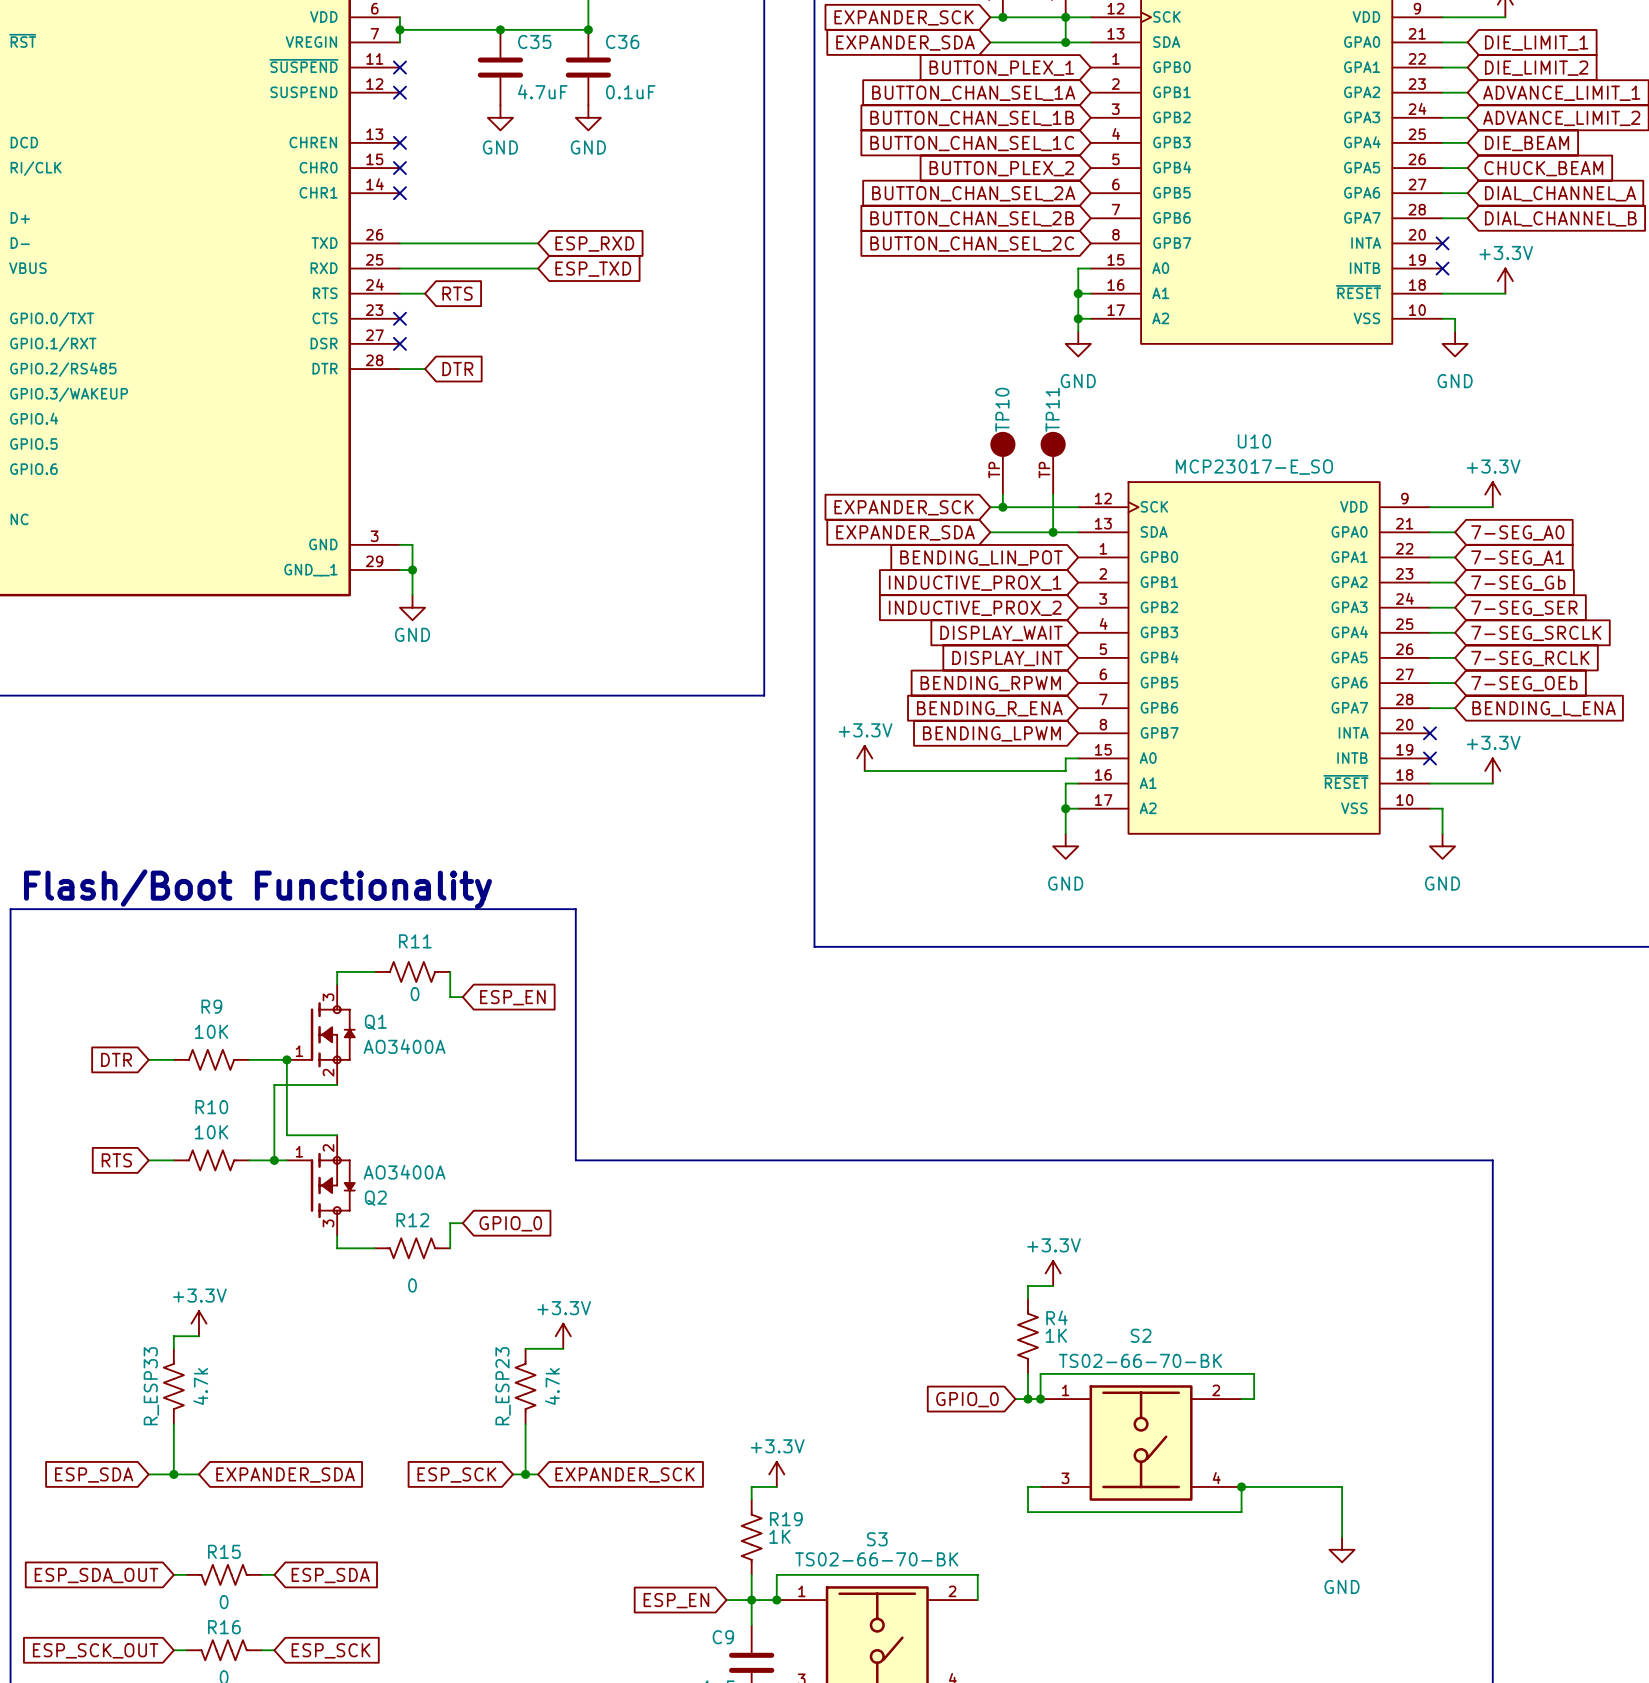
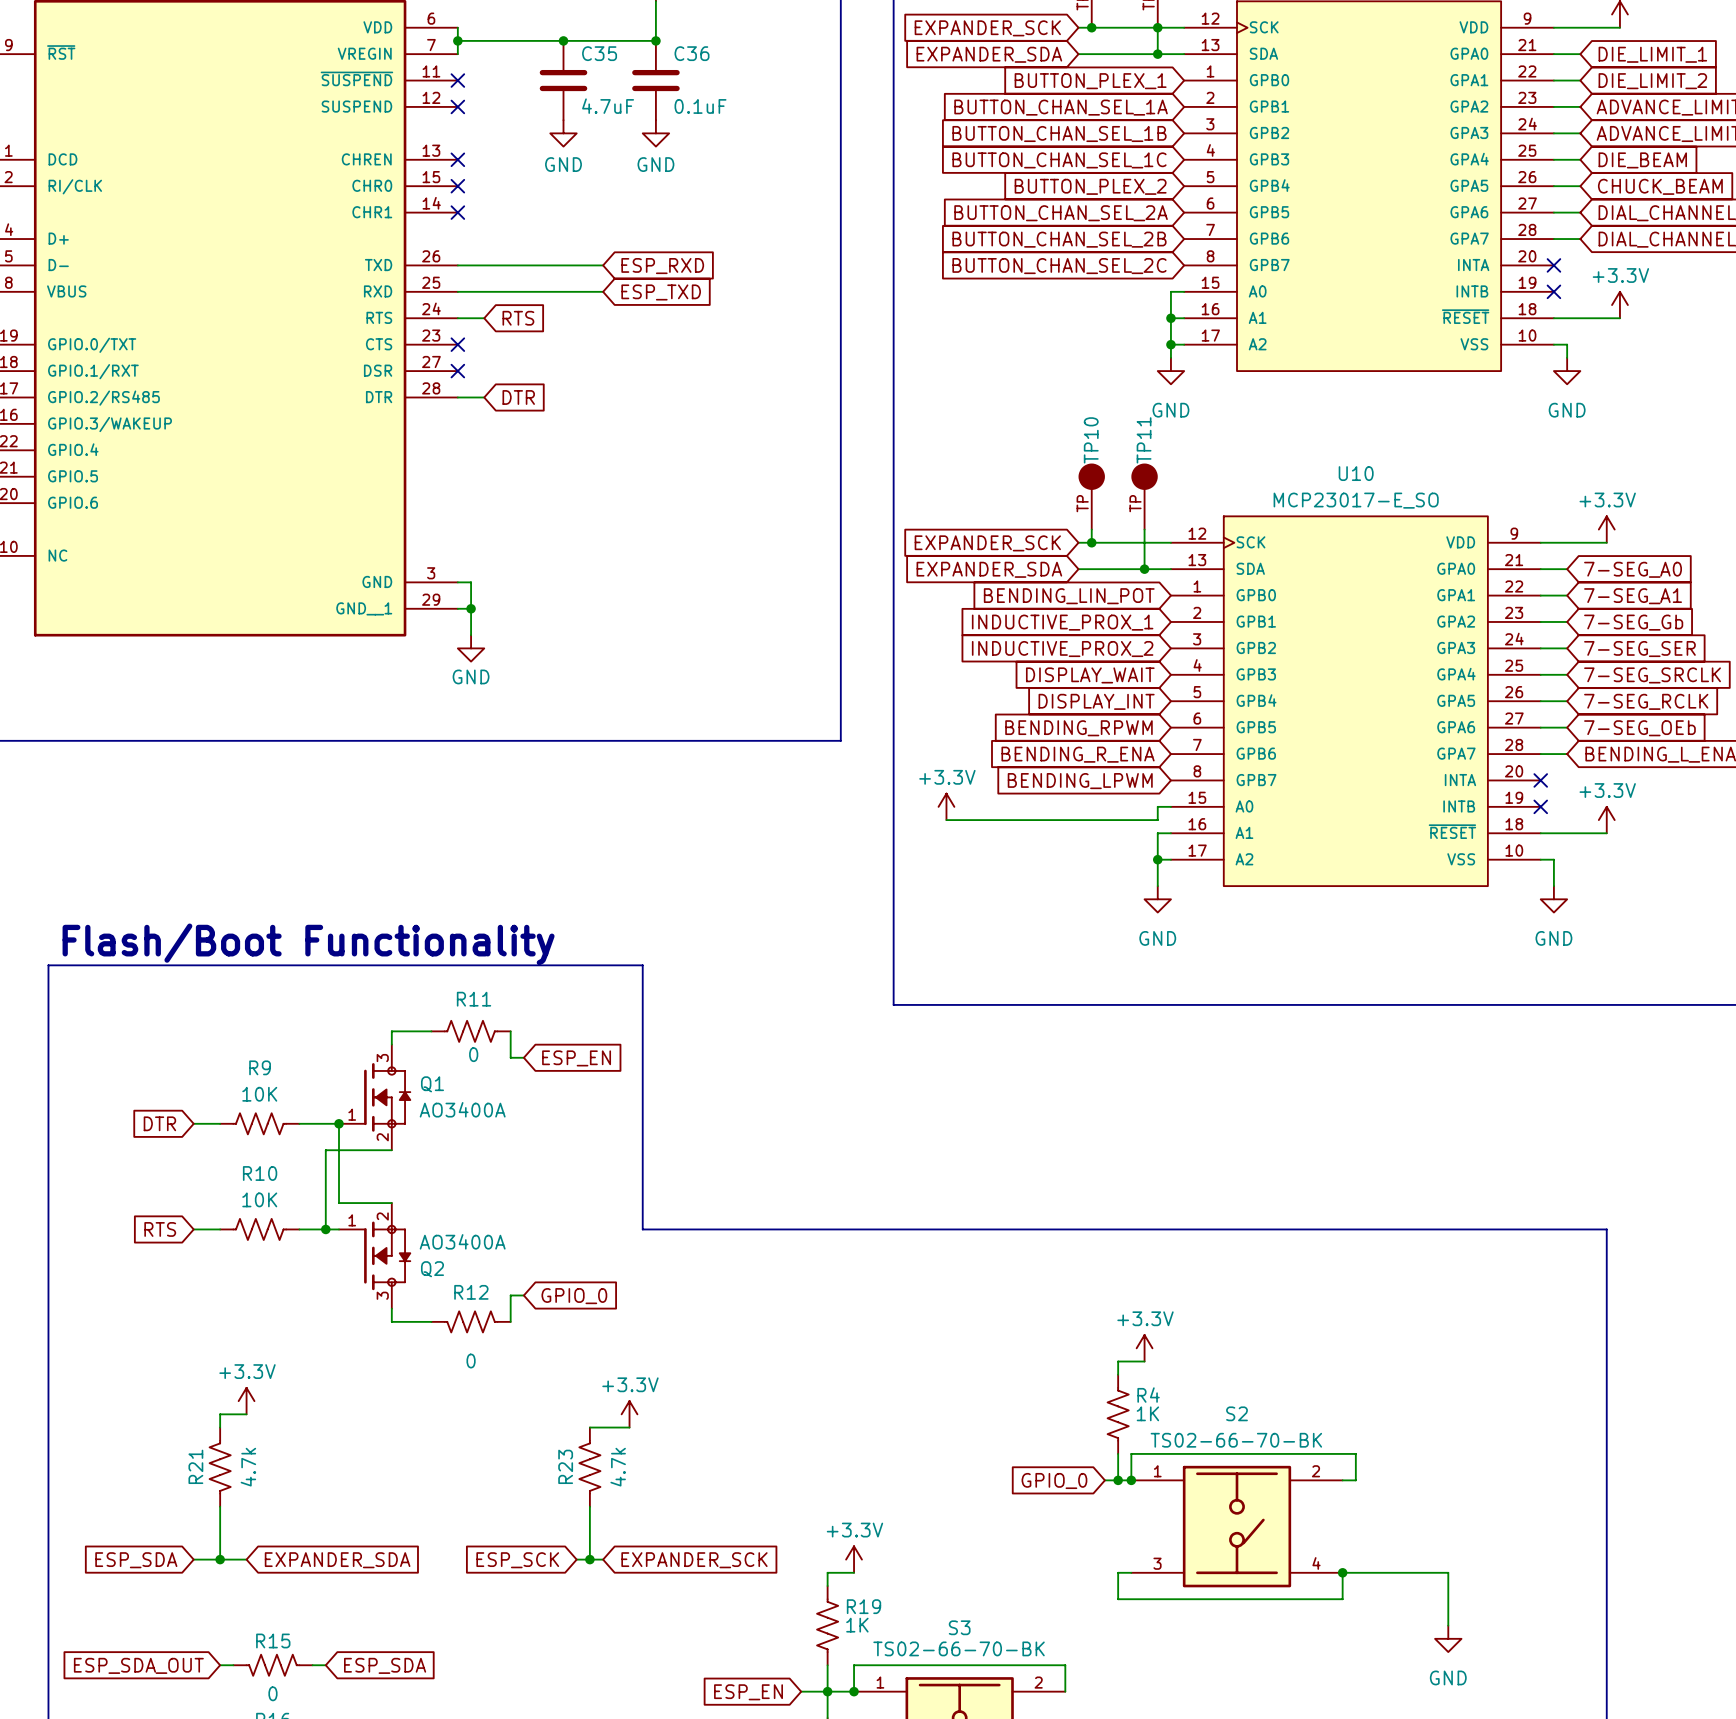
R_ESP33 name: R_ESP33 (151, 1386) -> R21 (195, 1466)
R_ESP23 name: R_ESP23 (503, 1386) -> R23 (565, 1466)

